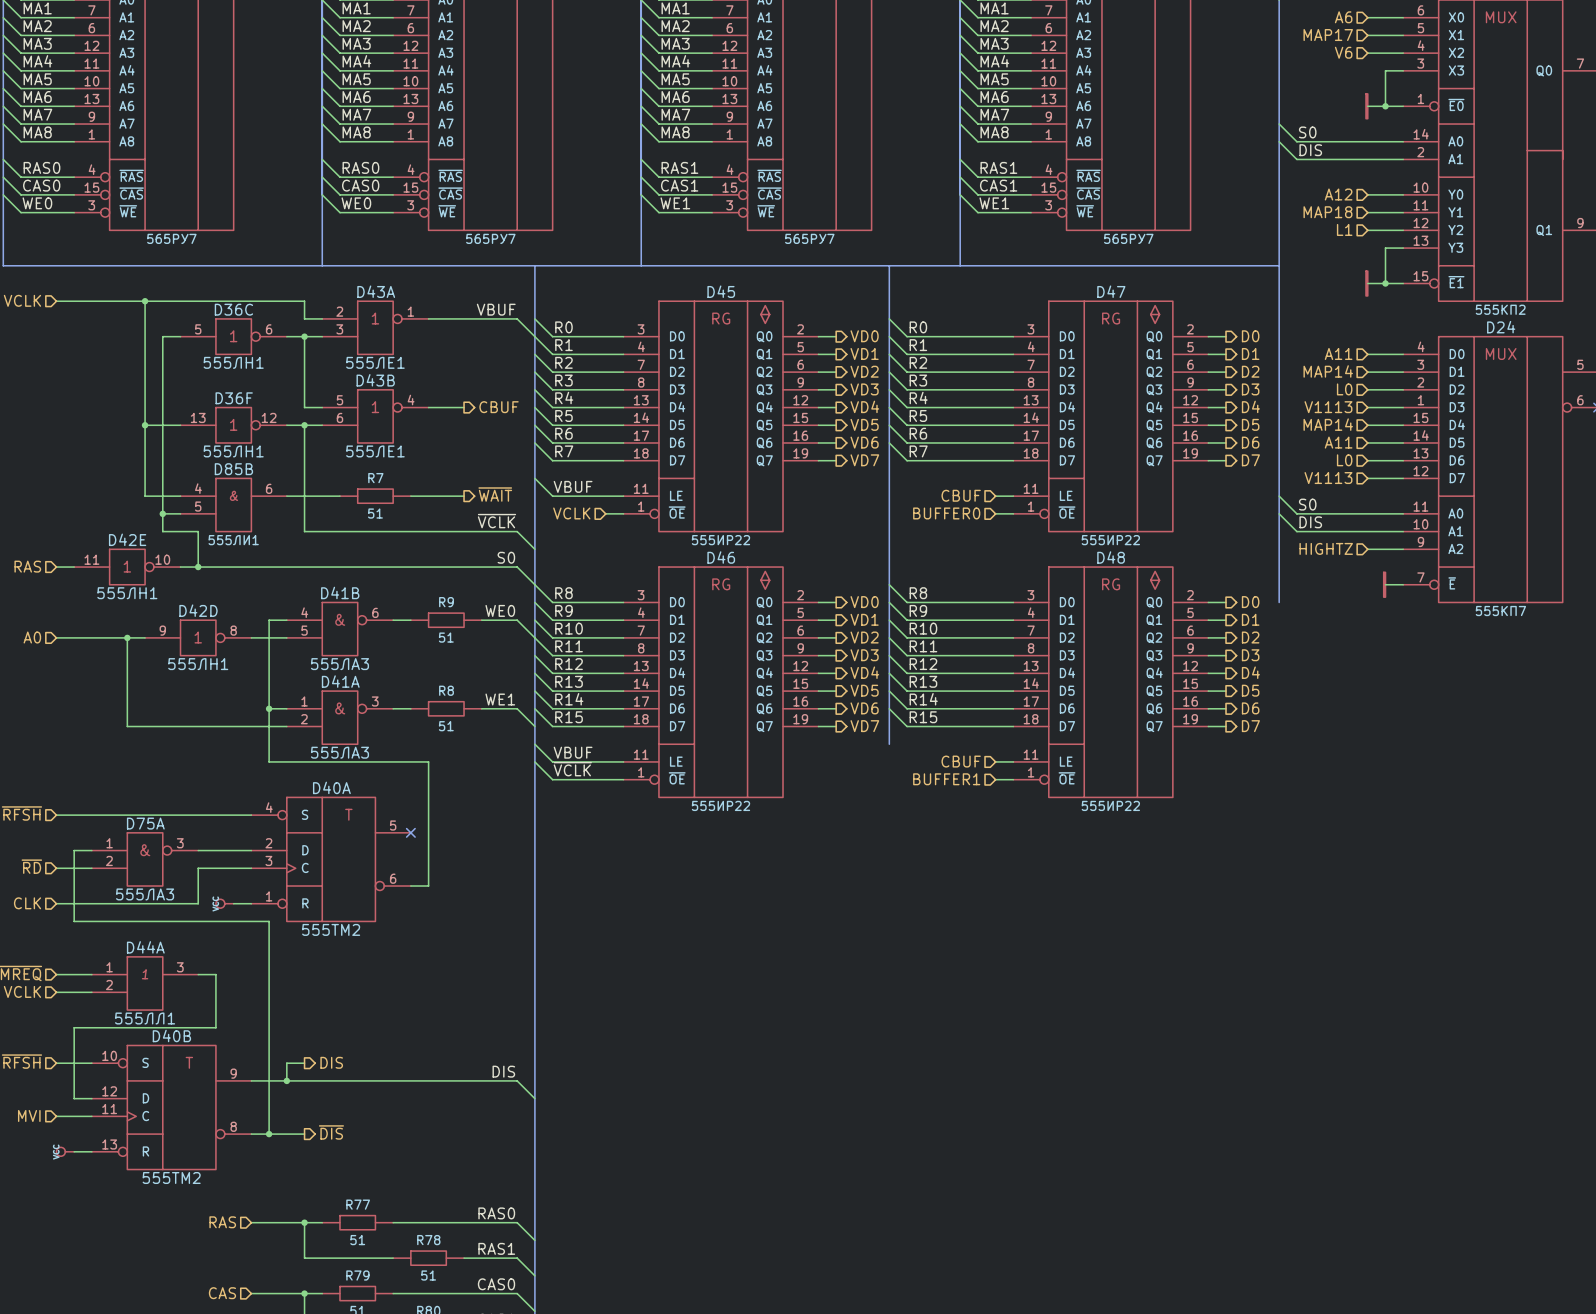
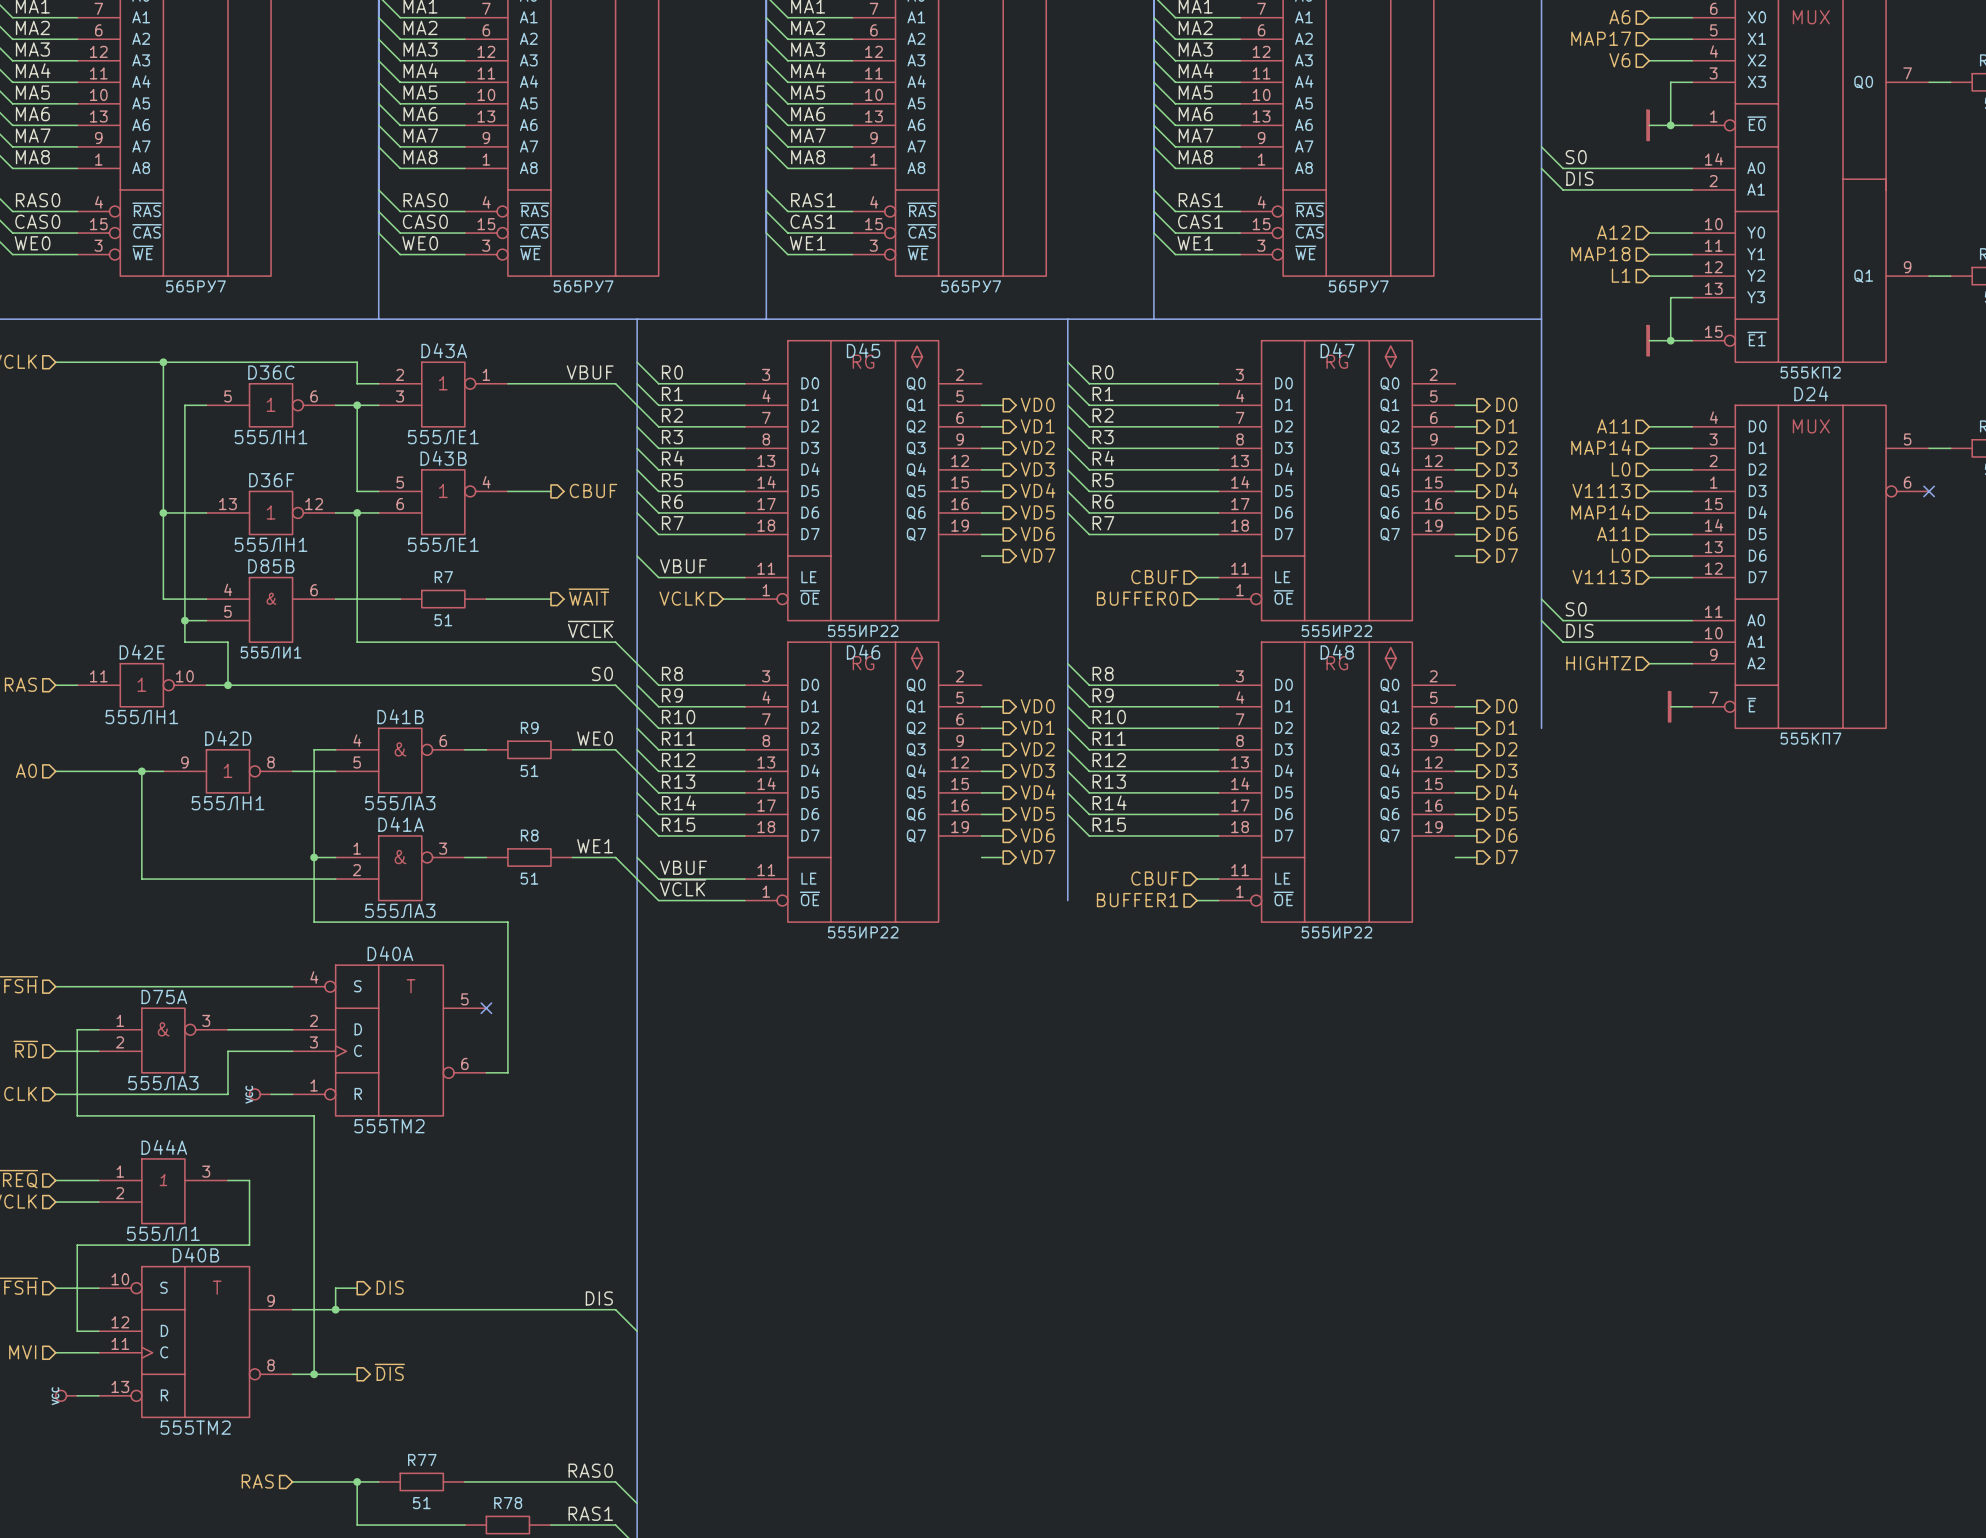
label: none -> R0 (672, 372)
label: none -> R0 (1103, 372)
label: R0 (563, 327) -> R1 (672, 394)
label: R0 (918, 327) -> R1 (1103, 394)
label: R1 (563, 345) -> R2 (672, 415)
label: R1 (918, 345) -> R2 (1103, 415)
label: R2 (563, 362) -> R3 (672, 437)
label: R2 (918, 362) -> R3 (1103, 437)
label: R3 (563, 380) -> R4 (672, 458)
label: R3 (918, 380) -> R4 (1103, 458)
label: R4 (564, 398) -> R5 (672, 480)
label: R4 (918, 398) -> R5 (1103, 480)
label: R5 (563, 415) -> R6 (672, 501)
label: R5 (918, 415) -> R6 (1103, 501)
D45 position: (720, 416) -> (863, 480)
D47 position: (1110, 416) -> (1336, 480)
label: R6 (563, 433) -> R7 (672, 523)
label: R6 (918, 433) -> R7 (1103, 523)
wire: (534, 442) (552, 460) (623, 460) -> (637, 362) (658, 383) (744, 383)
wire: (889, 442) (907, 460) (1013, 460) -> (1067, 362) (1089, 383) (1218, 383)
label: R7 (564, 451) -> none
label: R7 (918, 451) -> none
wire: none -> (637, 556) (658, 577) (744, 577)
wire: (534, 478) (552, 496) (605, 496) -> none
hierarchical label: none -> CBUF (1155, 577)
label position: VBUF (573, 486) -> VBUF (683, 566)
hierarchical label: CBUF (961, 495) -> BUFFER0 (1137, 598)
hierarchical label position: VCLK (571, 513) -> VCLK (681, 598)
wire: (605, 513) (623, 513) -> none
hierarchical label: BUFFER0 (946, 513) -> none
wire: (995, 513) (1013, 513) -> (1196, 577) (1218, 577)
label: none -> R8 (672, 673)
D46 name position: D46 (721, 557) -> D46 (863, 652)
label: none -> R8 (1103, 673)
D48 name position: D48 (1111, 557) -> D48 (1337, 652)
wire: none -> (637, 685) (658, 706) (744, 706)
wire: none -> (1067, 685) (1089, 706) (1218, 706)
label: none -> R9 (672, 695)
label: none -> R9 (1103, 695)
hierarchical label: none -> VD0 (1037, 706)
hierarchical label: none -> D0 (1506, 706)
label: R8 (563, 593) -> R10 (678, 717)
label: R8 (918, 593) -> R10 (1109, 717)
hierarchical label: VD0 (864, 602) -> VD1 (1037, 727)
hierarchical label: D0 (1250, 602) -> D1 (1506, 727)
label: R9 (563, 610) -> R11 (678, 738)
label: R9 (918, 610) -> R11 (1109, 738)
hierarchical label: VD1 (864, 619) -> VD2 (1037, 749)
hierarchical label: D1 (1250, 619) -> D2 (1506, 749)
label: R10 (569, 628) -> R12 (678, 760)
label: R10 (923, 628) -> R12 (1109, 760)
hierarchical label: VD2 (864, 637) -> VD3 (1037, 770)
hierarchical label: D2 (1250, 637) -> D3 (1506, 770)
label: R11 (569, 646) -> R13 (678, 781)
label: R11 (923, 646) -> R13 (1109, 781)
hierarchical label: VD3 (864, 655) -> VD4 (1038, 792)
hierarchical label: D3 (1250, 655) -> D4 (1507, 792)
label: R12 (569, 664) -> R14 (678, 802)
label: R12 (923, 664) -> R14 (1109, 802)
hierarchical label: VD4 (864, 672) -> VD5 (1037, 813)
hierarchical label: D4 (1250, 672) -> D5 (1506, 813)
label: R13 (569, 681) -> R15 (678, 824)
label: R13 (923, 681) -> R15 (1109, 824)
D46 position: (720, 682) -> (863, 782)
D48 position: (1110, 682) -> (1336, 782)
hierarchical label: VD5 (864, 690) -> VD6 (1037, 835)
hierarchical label: D5 (1250, 690) -> D6 (1506, 835)
wire: (534, 691) (552, 708) (623, 708) -> (637, 663) (658, 685) (744, 685)
wire: (889, 691) (907, 708) (1013, 708) -> (1067, 663) (1089, 685) (1218, 685)
label: R14 (569, 699) -> none
label: R14 (923, 699) -> none
hierarchical label: VD6 (864, 708) -> VD7 (1038, 857)
wire: (889, 708) (907, 726) (995, 726) -> none
hierarchical label: D6 (1250, 708) -> D7 (1507, 857)
label: R15 (569, 717) -> VBUF (683, 867)
label: R15 (923, 717) -> none
wire: (818, 726) (836, 726) -> (981, 706) (1003, 706)
hierarchical label: VD7 (864, 726) -> none
wire: (1208, 726) (1226, 726) -> (1455, 706) (1476, 706)
hierarchical label: D7 (1250, 726) -> none
wire: (534, 744) (552, 761) (623, 761) -> none
label: VBUF (573, 752) -> none
wire: (534, 761) (552, 779) (623, 779) -> (637, 879) (658, 900) (744, 900)
hierarchical label position: CBUF (961, 761) -> CBUF (1155, 878)
wire: (995, 761) (1013, 761) -> none
label position: ~{VCLK} (572, 769) -> ~{VCLK} (683, 887)
hierarchical label position: BUFFER1 (946, 779) -> BUFFER1 (1137, 900)
wire: (995, 779) (1013, 779) -> (1196, 900) (1218, 900)

